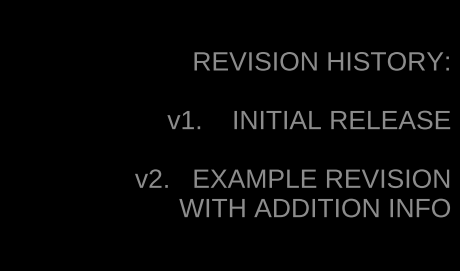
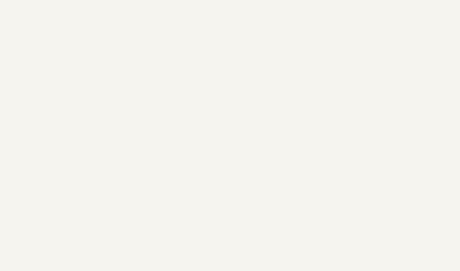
text: REVISION HISTORY: (321, 61) -> none
text: v1. INITIAL RELEASE (308, 120) -> none
text: v2. EXAMPLE REVISION (292, 178) -> none
text: WITH ADDITION INFO (314, 208) -> none

